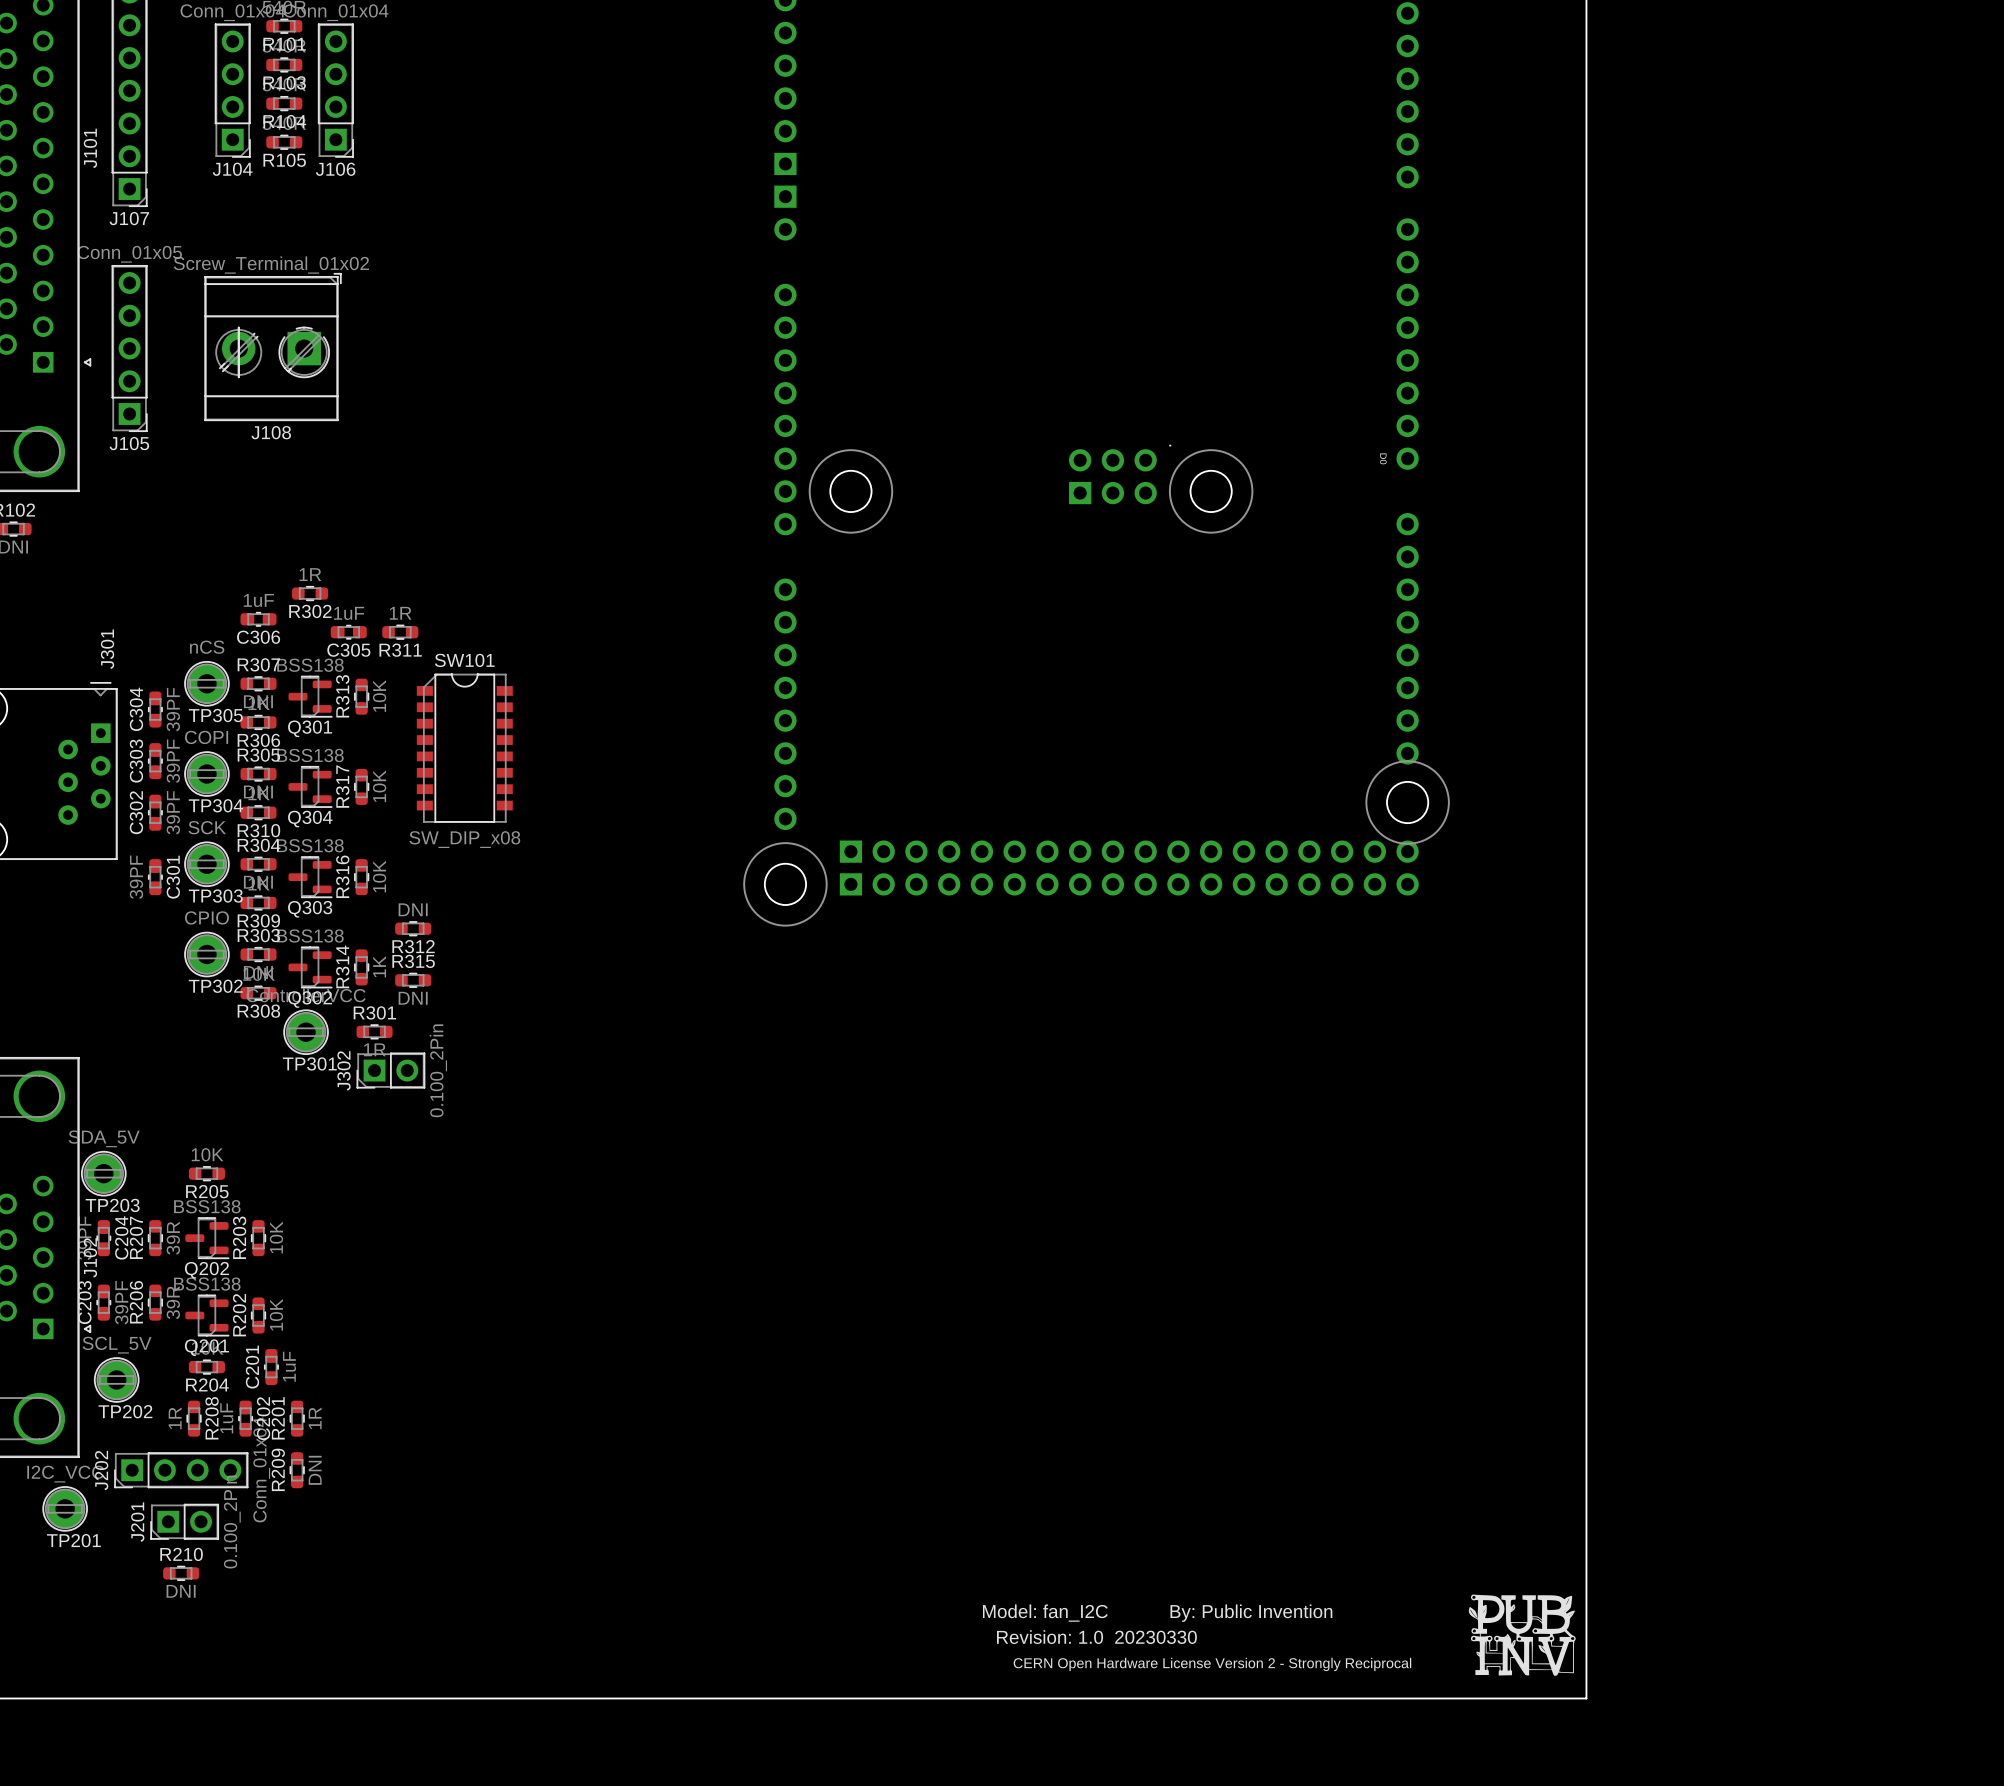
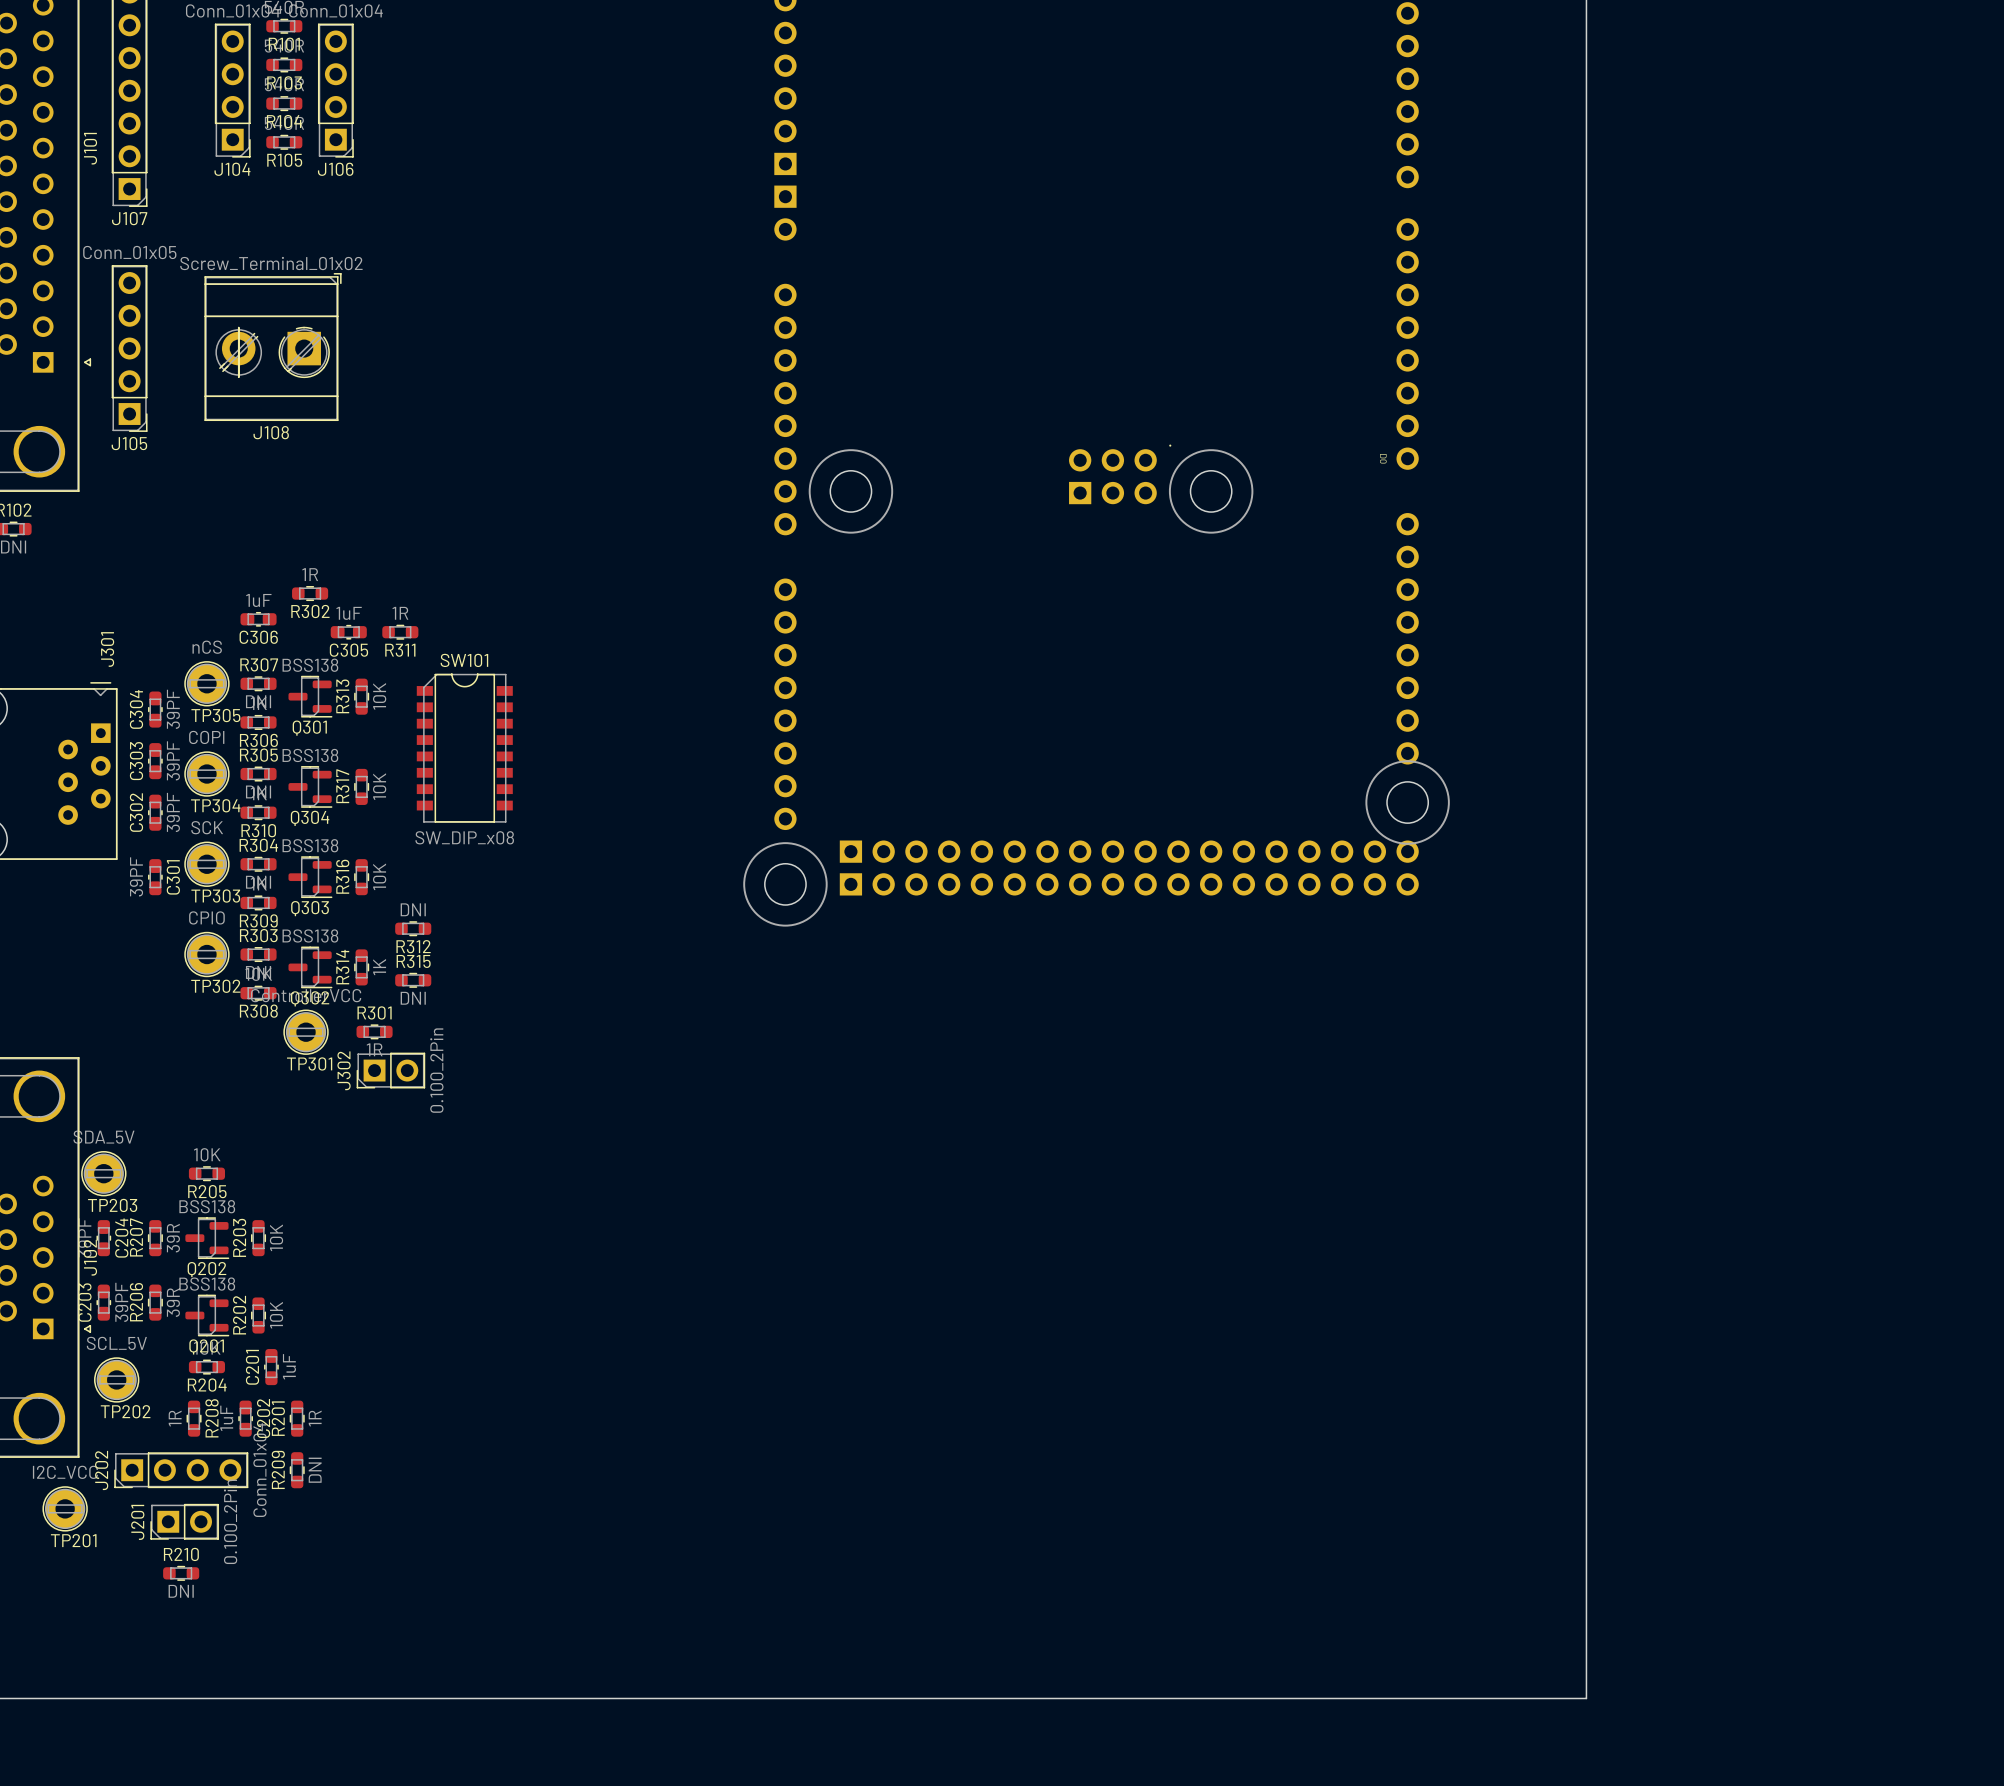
drawing: [1468, 1594, 1576, 1676] -> none
text: Model: fan_I2C (1045, 1613) -> none
text: By: Public Invention (1251, 1613) -> none
text: Revision: 1.0 20230330 (1096, 1637) -> none
text: CERN Open Hardware License Version 2 - Strongly Reciprocal (1212, 1664) -> none

